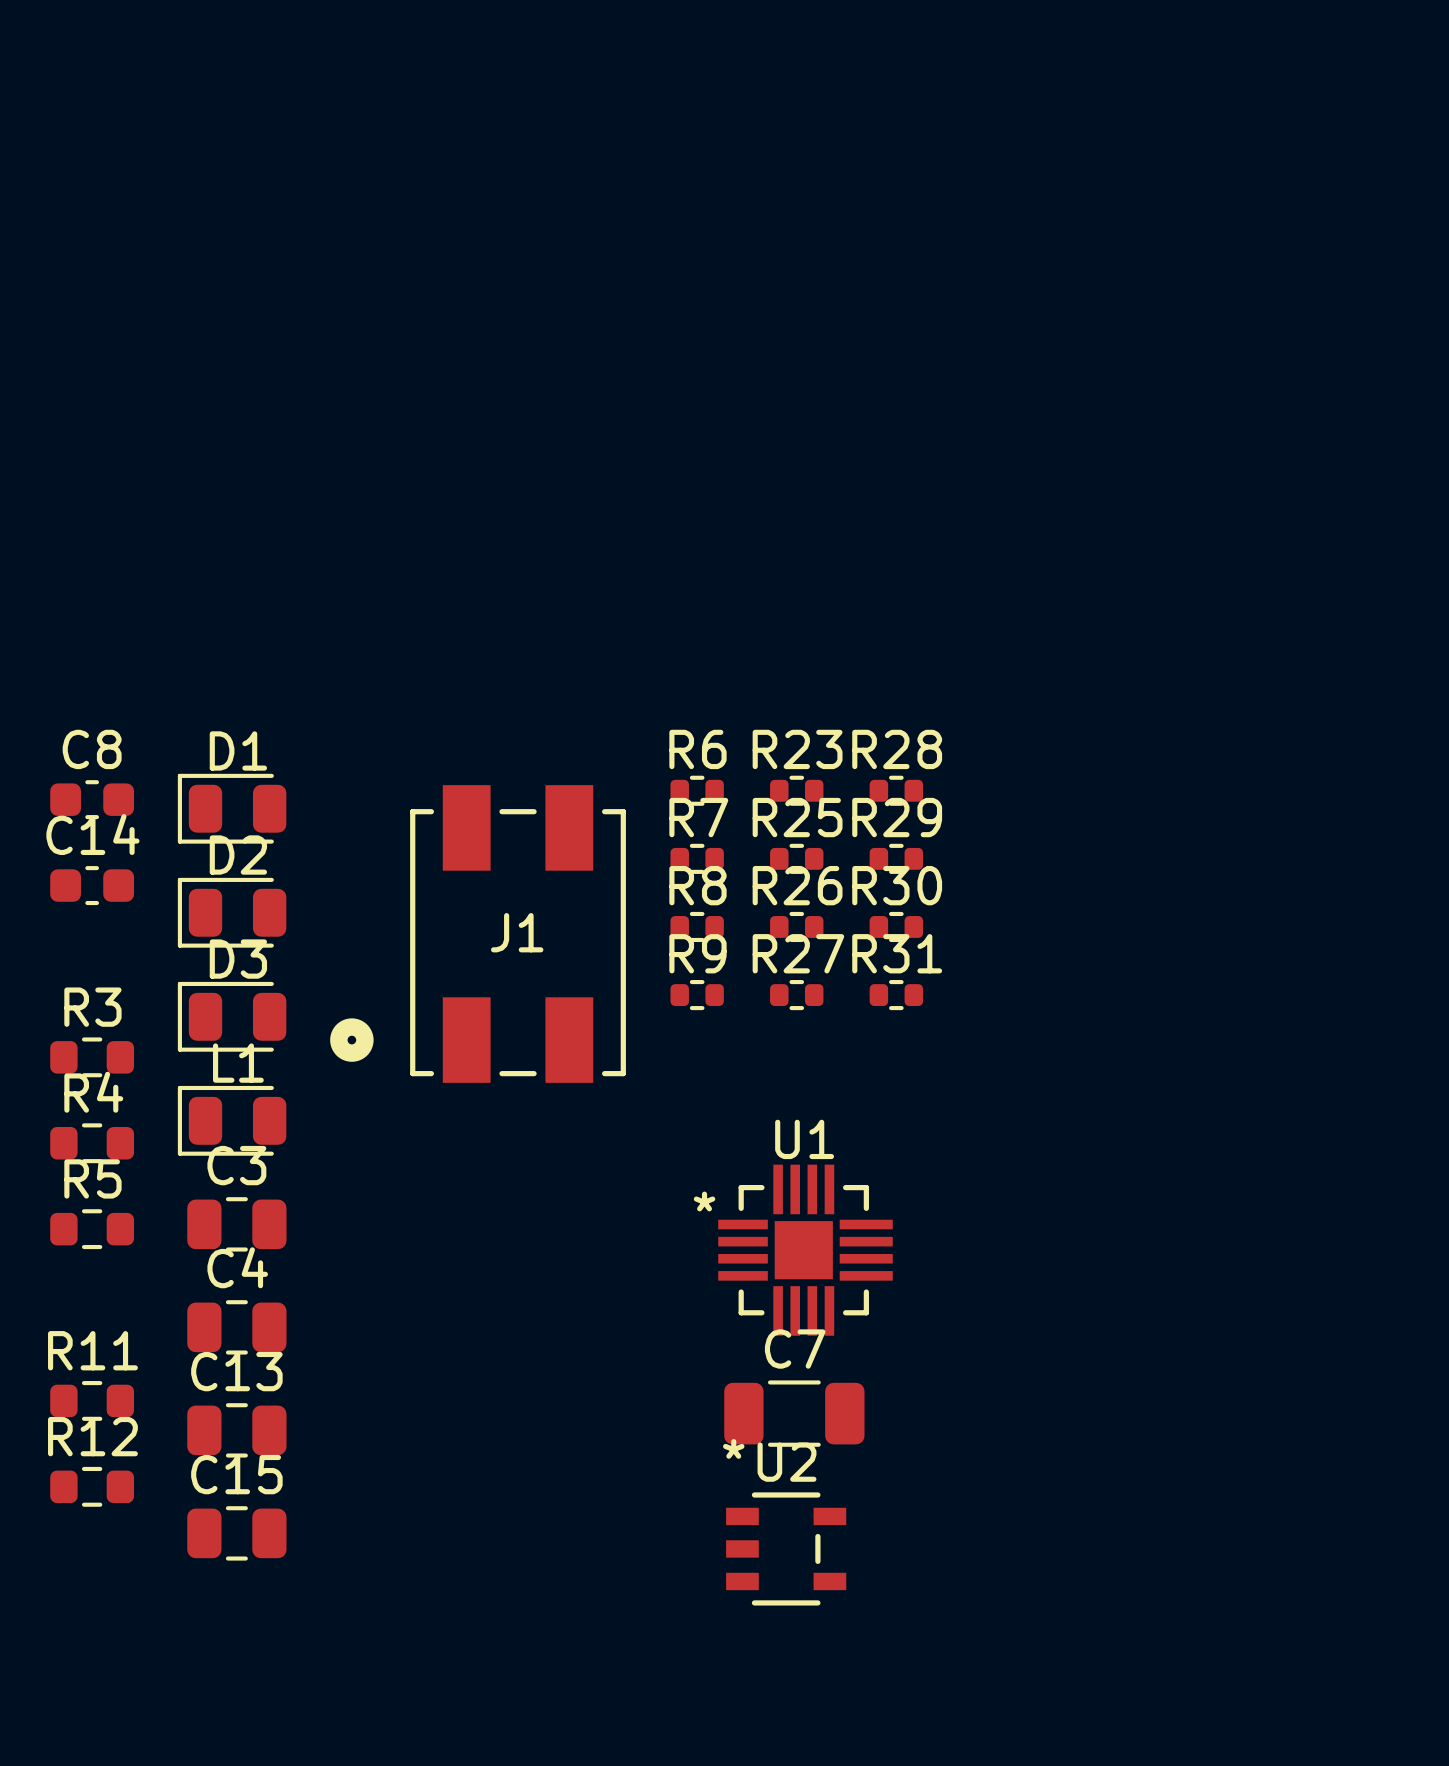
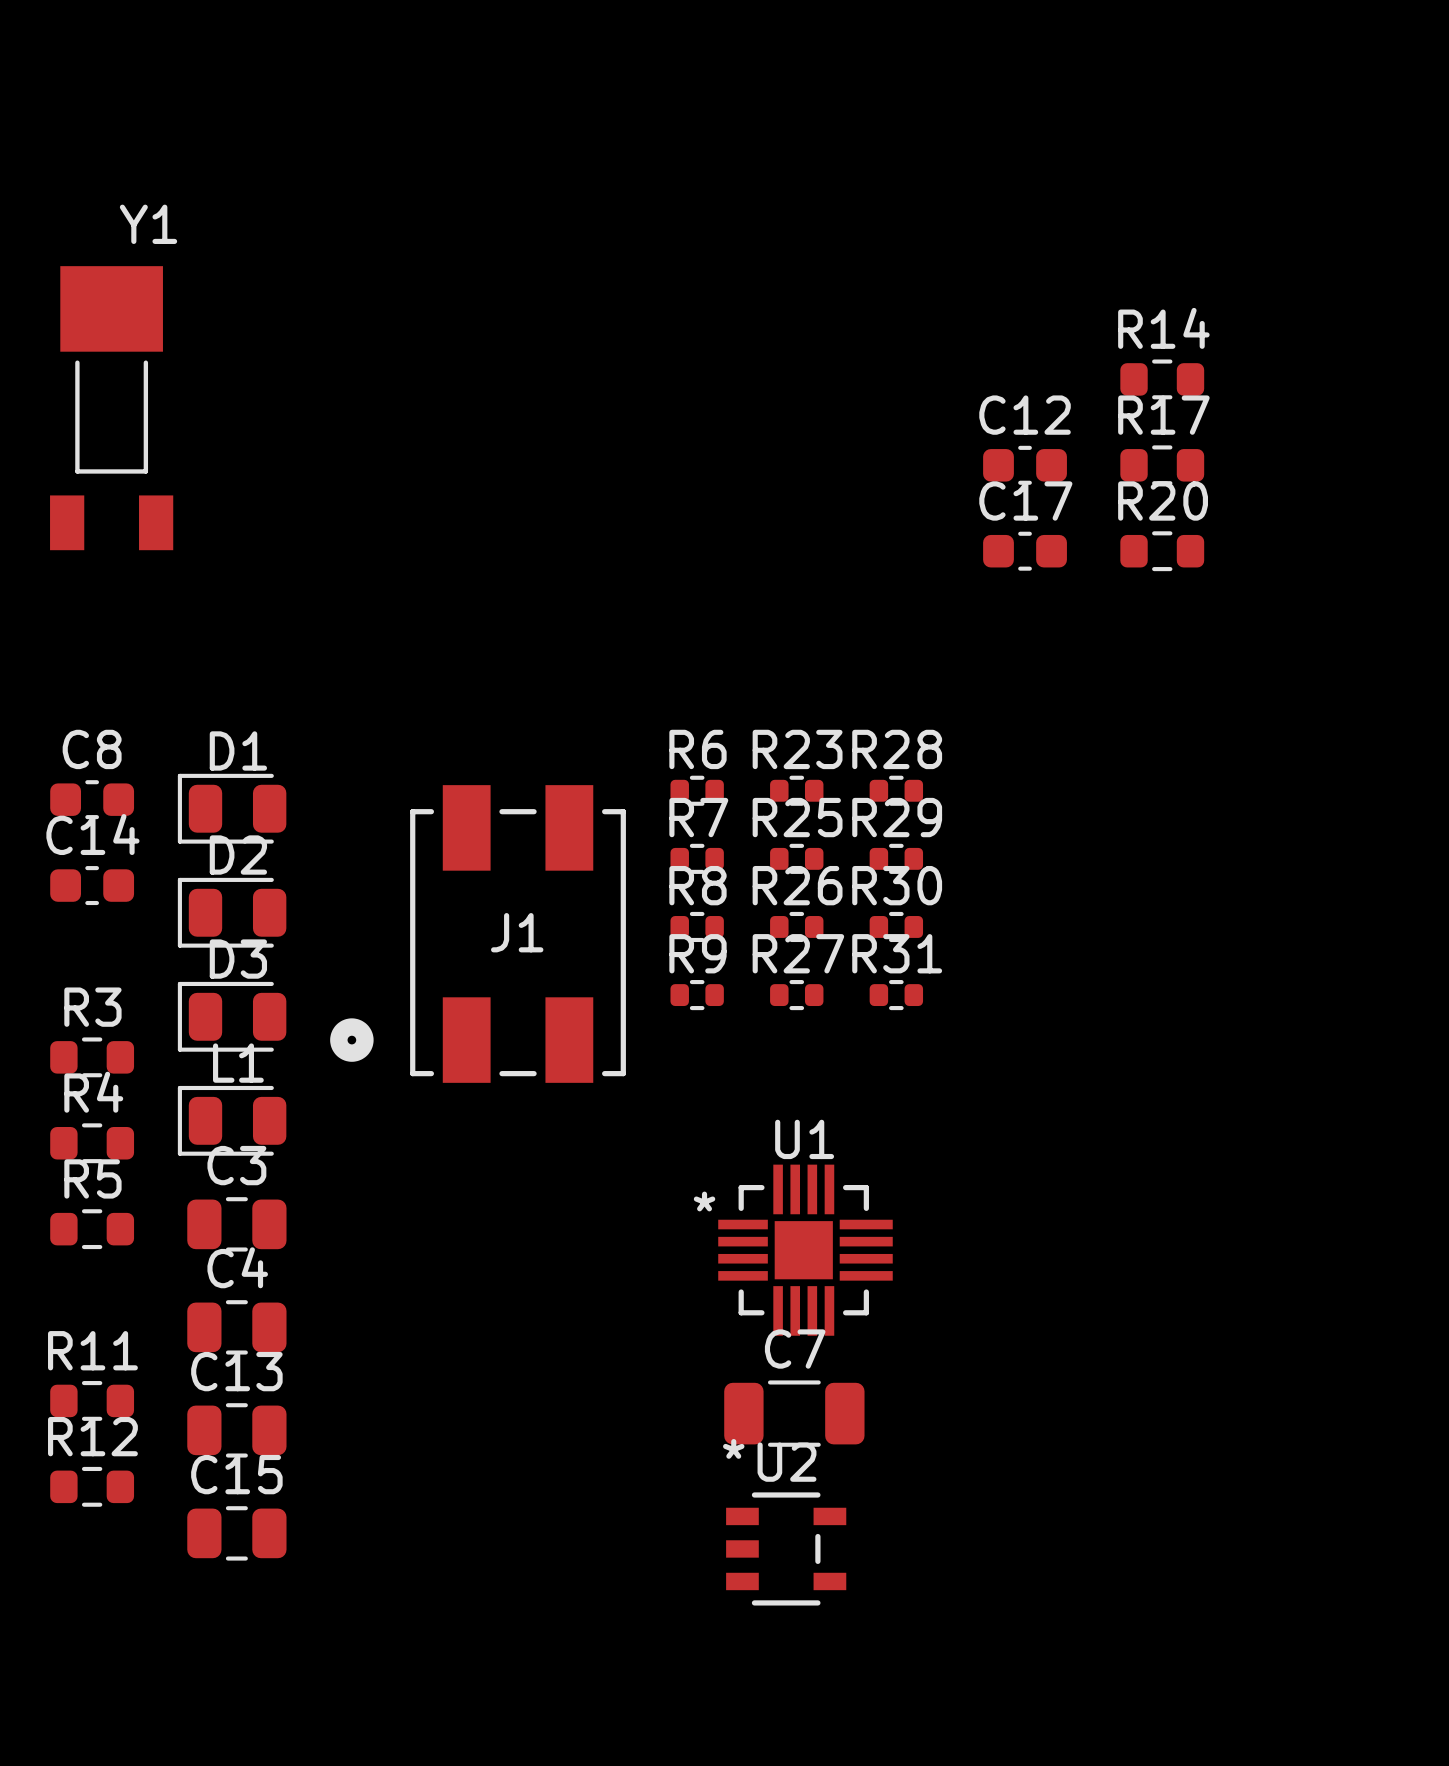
R14: none -> (1162, 379)
Y1: none -> (111, 408)
C12: none -> (1025, 465)
R17: none -> (1162, 465)
C17: none -> (1025, 551)
R20: none -> (1162, 551)

